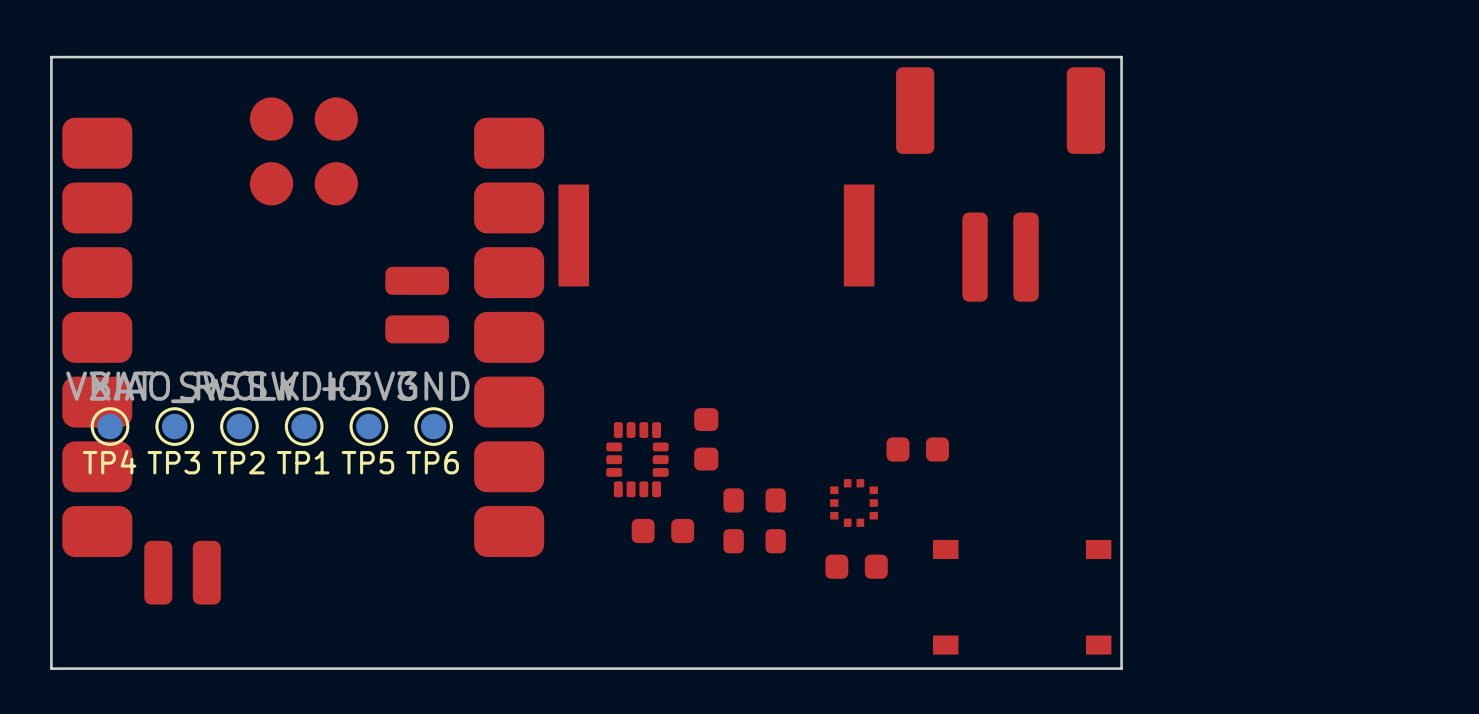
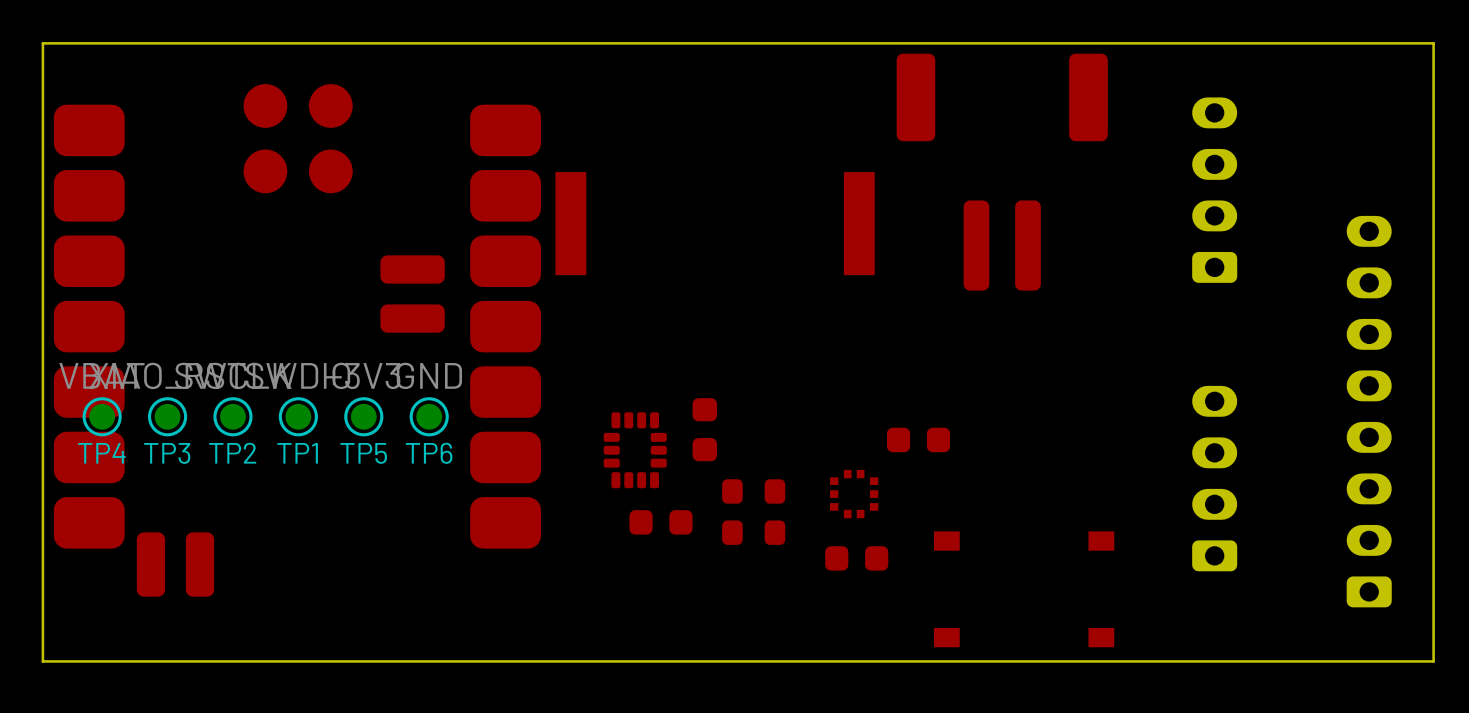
board edge: (1121, 57) (1121, 668) -> (1124, 43) (1433, 43) (1433, 661) (1124, 661)
part: none -> (1214, 190)
part: none -> (1369, 411)
part: none -> (1214, 478)

